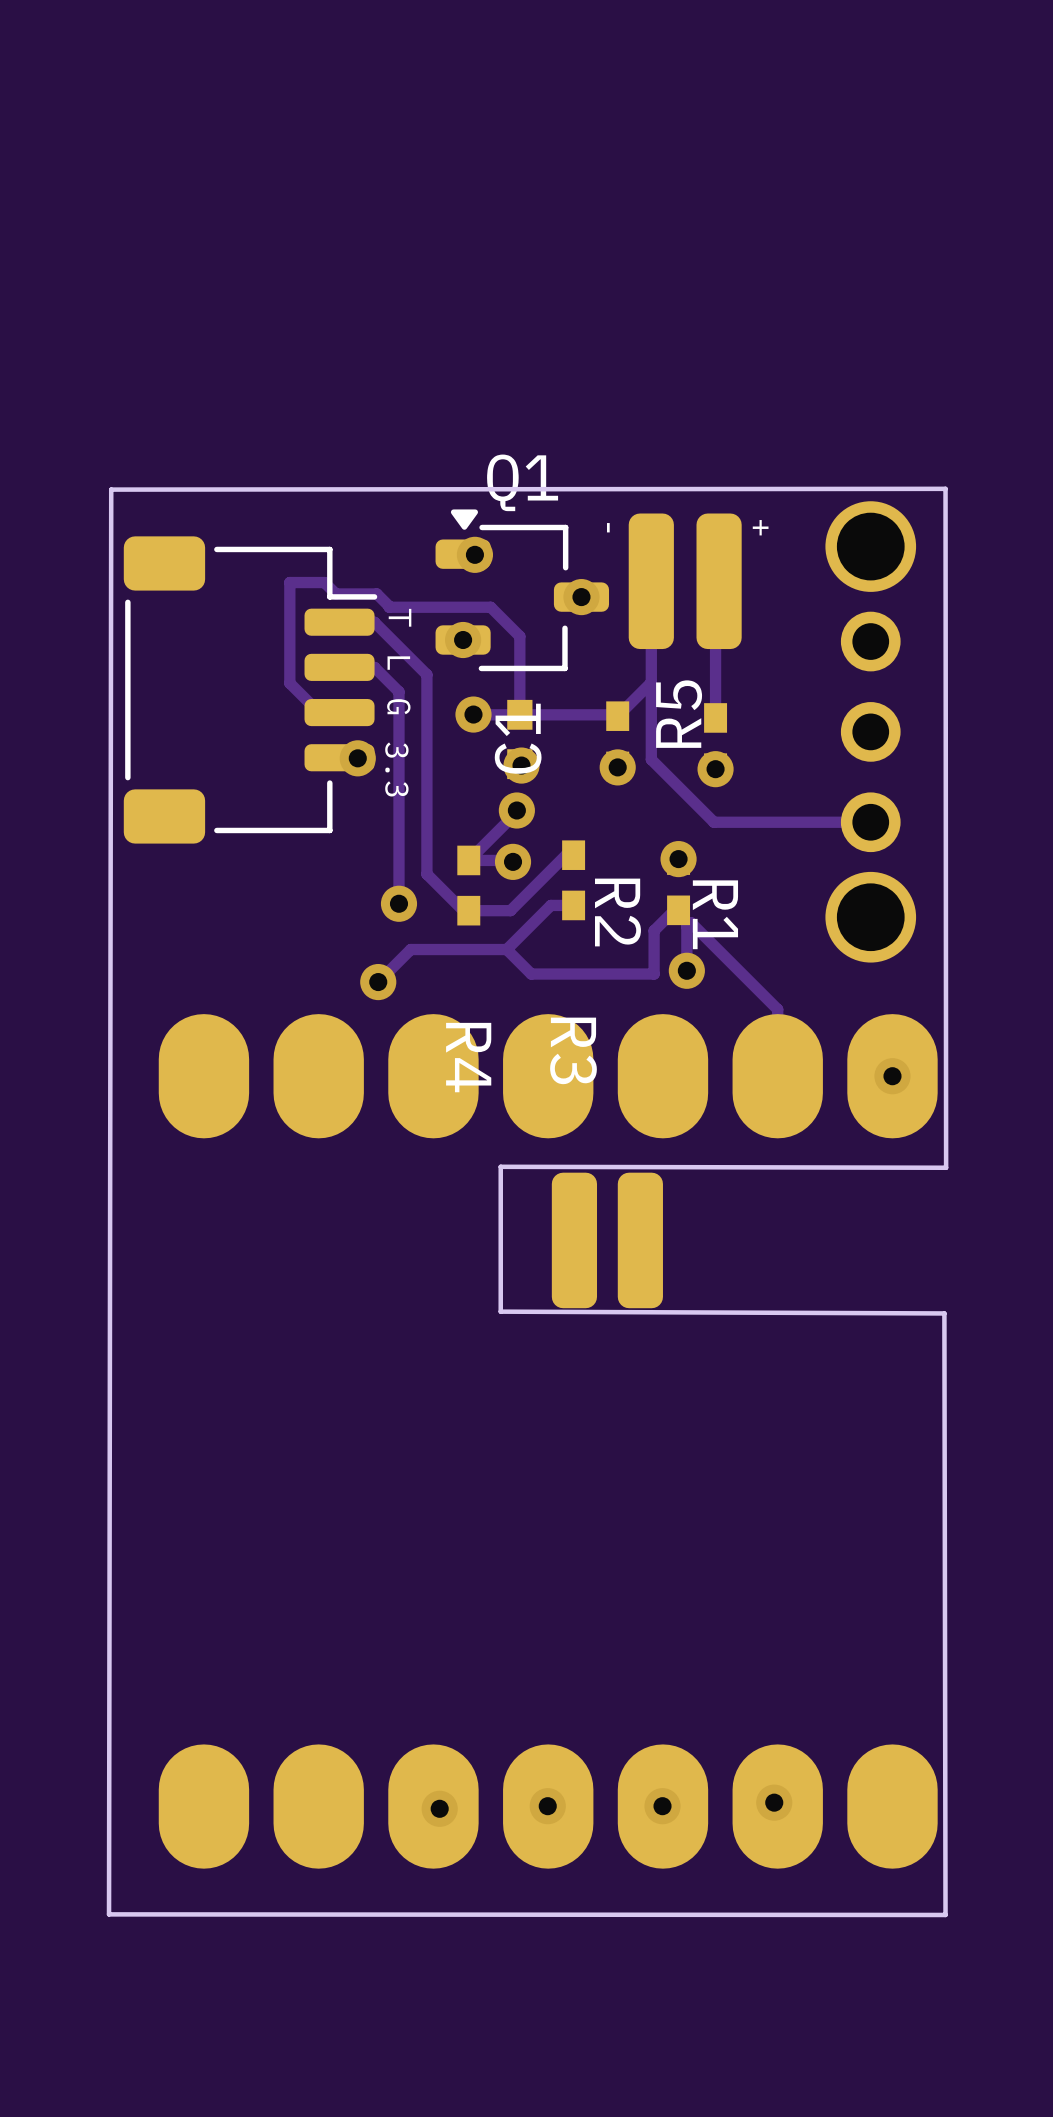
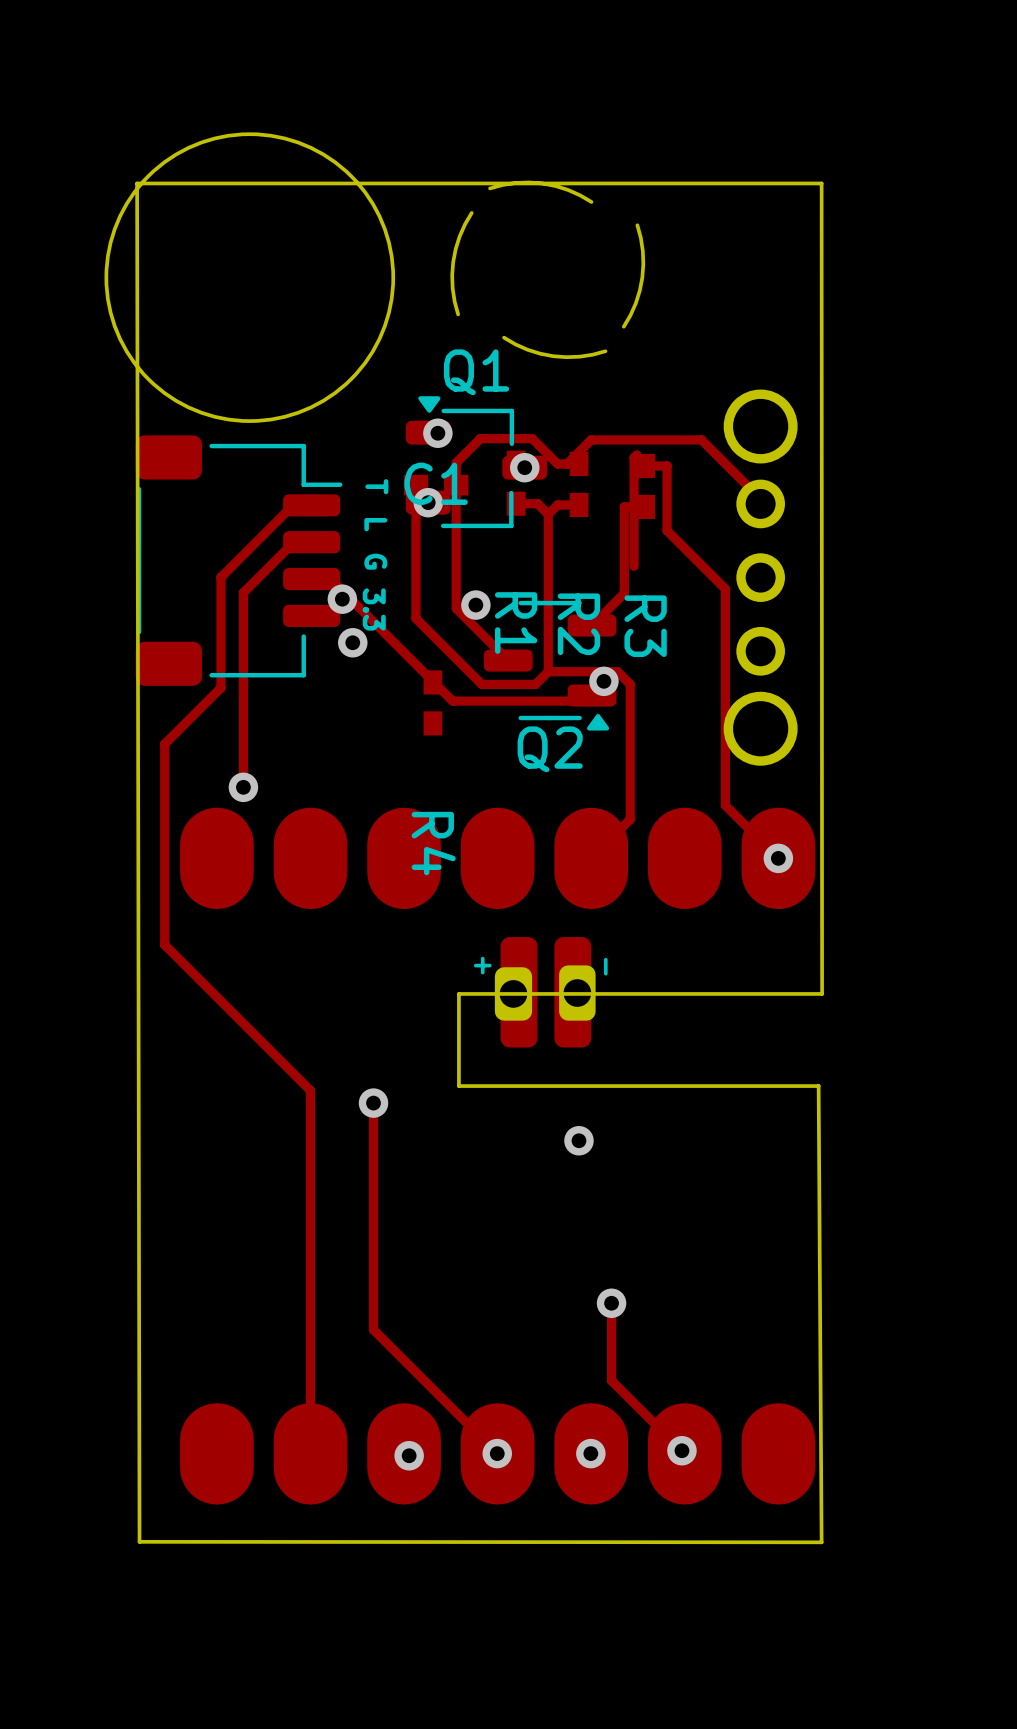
round board edge: none -> [104, 132, 396, 423]
board edge: none -> (490, 188) (515, 182) (542, 183) (567, 189) (591, 202)
board edge: none -> (471, 212) (459, 236) (453, 262) (452, 288) (458, 314)
board edge: none -> (637, 225) (642, 251) (642, 277) (635, 303) (623, 326)
board edge: none -> (504, 337) (527, 349) (553, 356) (579, 356) (605, 351)
track: (651, 581) (651, 759) (714, 822) (870, 822) -> none
part: (685, 581) -> none
track: none -> (567, 464) (591, 439) (701, 439) (776, 515)
track: none -> (579, 464) (557, 464) (532, 438) (480, 438) (456, 462) (456, 608) (508, 660)
track: none -> (645, 465) (667, 465) (667, 530) (725, 589) (725, 805) (778, 858)
track: (389, 606) (376, 593) (335, 593) (324, 582) (289, 582) (289, 683) (319, 712) (339, 712) -> none
track: (389, 607) (490, 607) (519, 636) (519, 714) -> none
track: none -> (415, 485) (415, 618) (481, 684) (535, 684) (548, 671)
track: (339, 622) (374, 622) (426, 674) (426, 874) (463, 910) (510, 910) (566, 855) (573, 855) -> none
track: none -> (516, 503) (537, 503) (548, 514)
track: none -> (579, 504) (557, 504) (548, 514)
track: none -> (311, 505) (292, 505) (220, 577) (220, 687) (164, 744) (164, 944) (310, 1090) (310, 1453)
track: none -> (645, 506) (624, 506) (624, 593) (592, 625)
track: none -> (548, 514) (548, 671)
track: (339, 667) (374, 667) (398, 691) (398, 903) -> none
track: (651, 682) (617, 716) (473, 714) -> none
track: none -> (311, 542) (293, 542) (243, 592) (243, 787)
part position: (250, 689) -> (239, 560)
via: (473, 714) -> none
track: none -> (311, 579) (330, 579) (452, 701) (586, 701) (592, 695)
C1 rotation: 0° (519, 739) -> 90° clockwise (436, 485)
C1 position: (519, 739) -> (436, 485)
R2 position: (617, 741) -> (579, 484)
R1 position: (715, 743) -> (516, 483)
via: (617, 767) -> none
via: (715, 769) -> none
track: (516, 810) (468, 860) (513, 861) -> none
via: (516, 810) -> none
via: none -> (352, 642)
Q2: none -> (550, 665)
track: none -> (548, 671) (617, 671) (630, 684) (630, 819) (591, 858)
via: (513, 861) -> none
R3 position: (573, 880) -> (645, 486)
R5: (678, 885) -> none
via: (398, 903) -> none
track: (681, 903) (654, 930) (654, 974) (531, 974) (506, 949) -> none
track: (573, 905) (550, 905) (506, 949) -> none
track: (506, 949) (410, 949) (378, 982) -> none
track: (686, 970) (686, 926) (690, 922) (777, 1009) (777, 1076) -> none
via: (686, 970) -> none
via: (378, 982) -> none
via: none -> (243, 787)
part: none -> (545, 993)
board edge: (500, 1242) (500, 1166) (946, 1167) (945, 488) (111, 489) (109, 1914) -> (458, 993) (822, 993) (821, 183) (137, 183) (139, 1541)
board edge: (500, 1311) (944, 1313) (945, 1914) -> (458, 1050) (458, 1086) (818, 1086) (821, 1542)
track: none -> (373, 1103) (373, 1329) (497, 1453)
via: none -> (373, 1103)
via: none -> (578, 1140)
track: none -> (611, 1303) (611, 1380) (684, 1453)
via: none -> (611, 1303)

